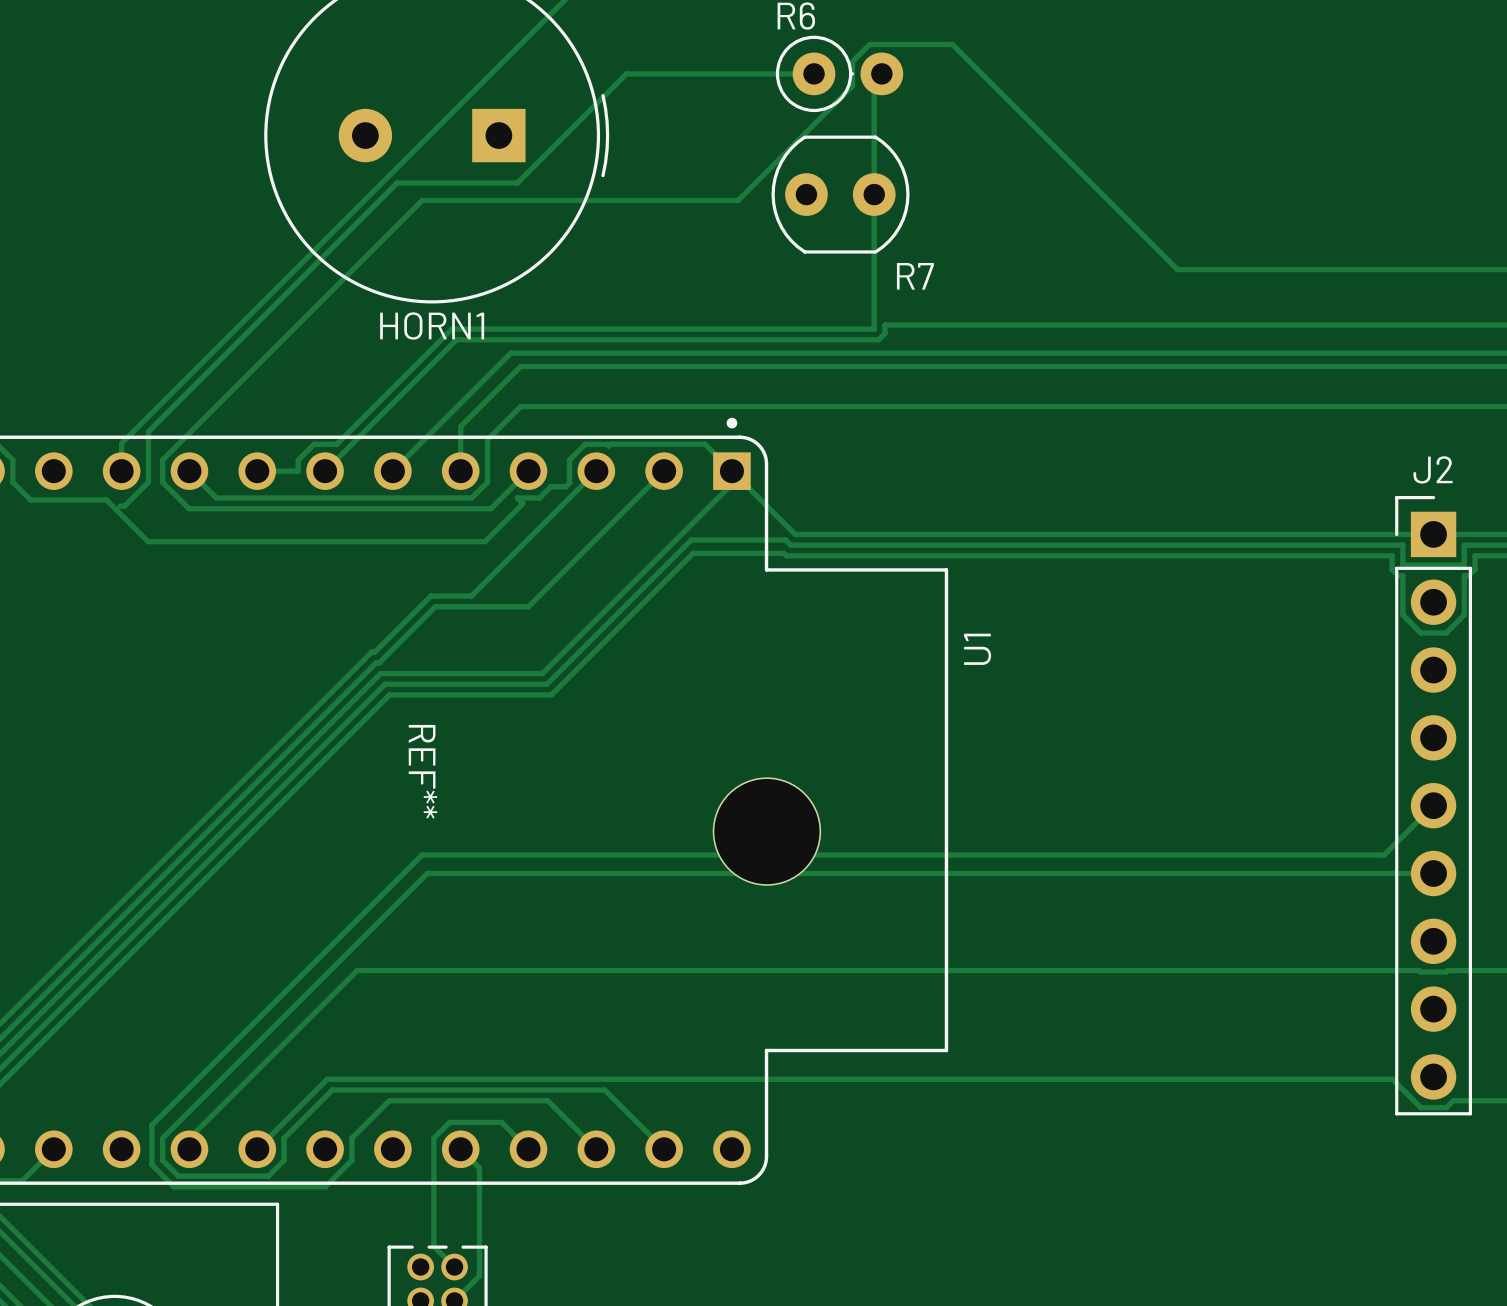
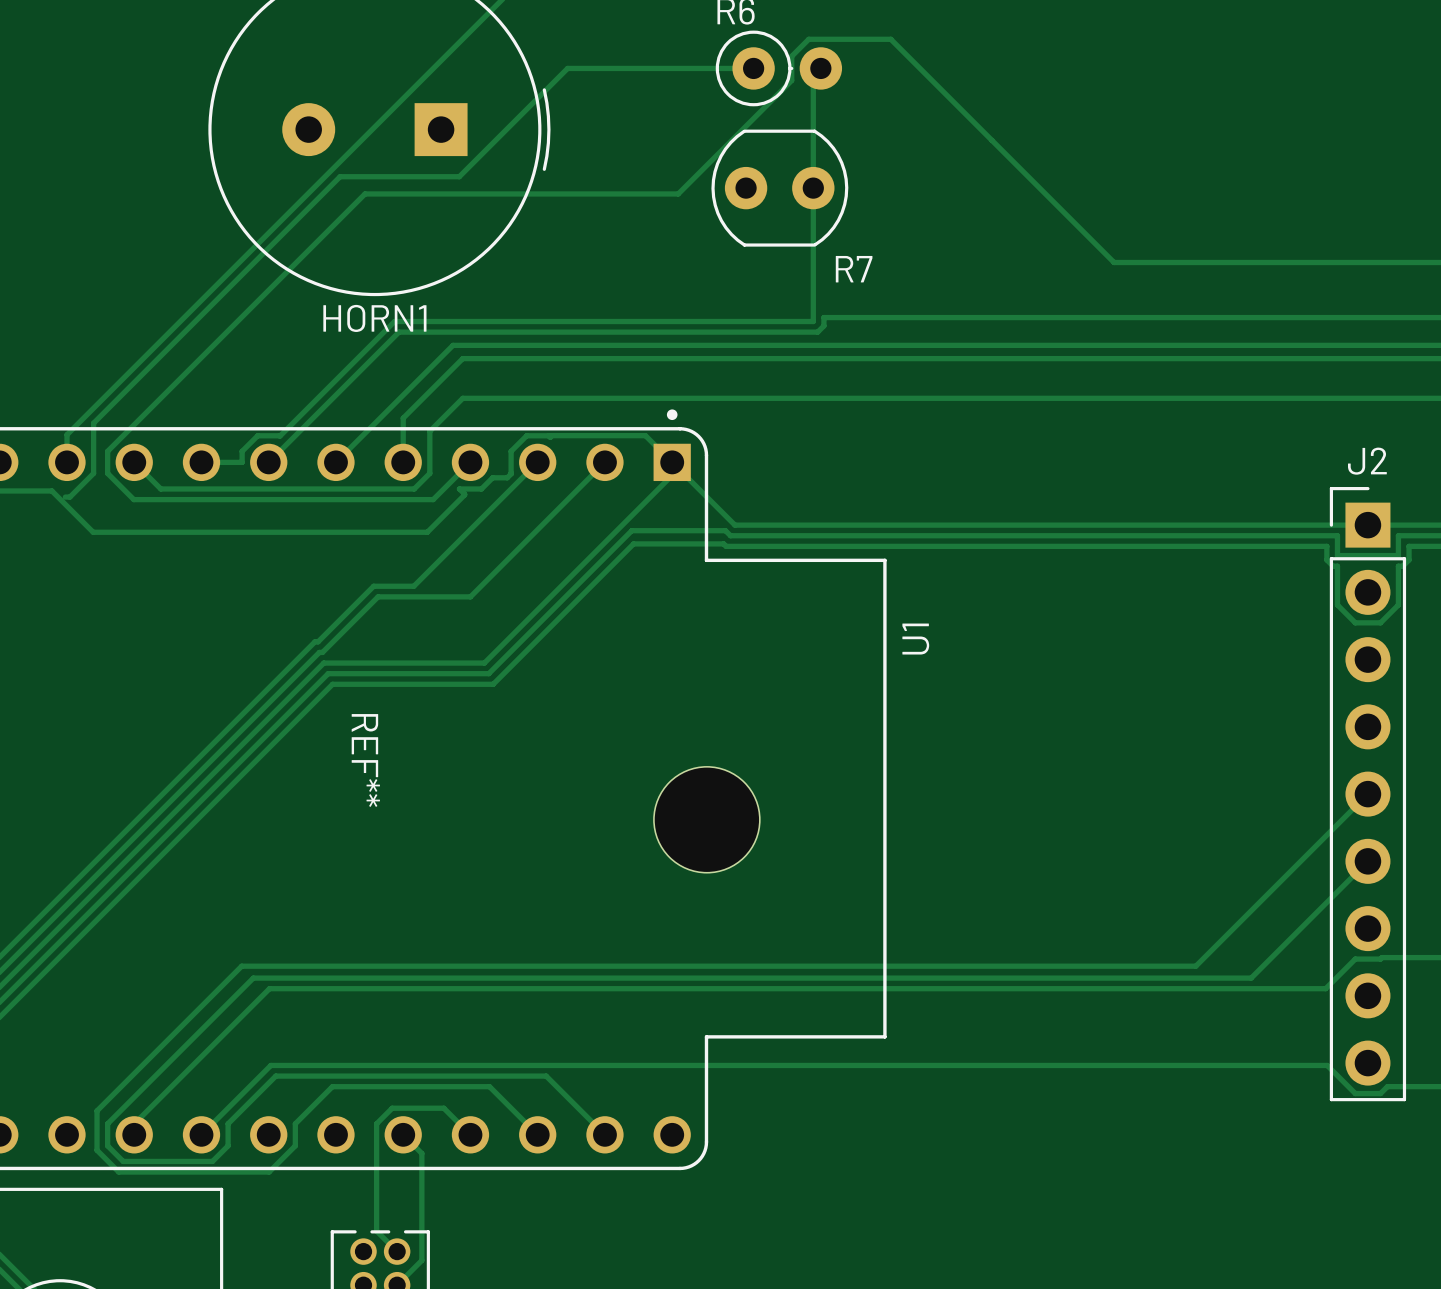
track: (1384, 855) (421, 855) (297, 979) -> (1318, 843) (1195, 966) (241, 966)
track: (1433, 873) (427, 873) (309, 991) -> (1367, 861) (1251, 978) (253, 978)
track: (1420, 972) (357, 970) (325, 1001) -> (1355, 959) (1325, 988) (269, 988)

